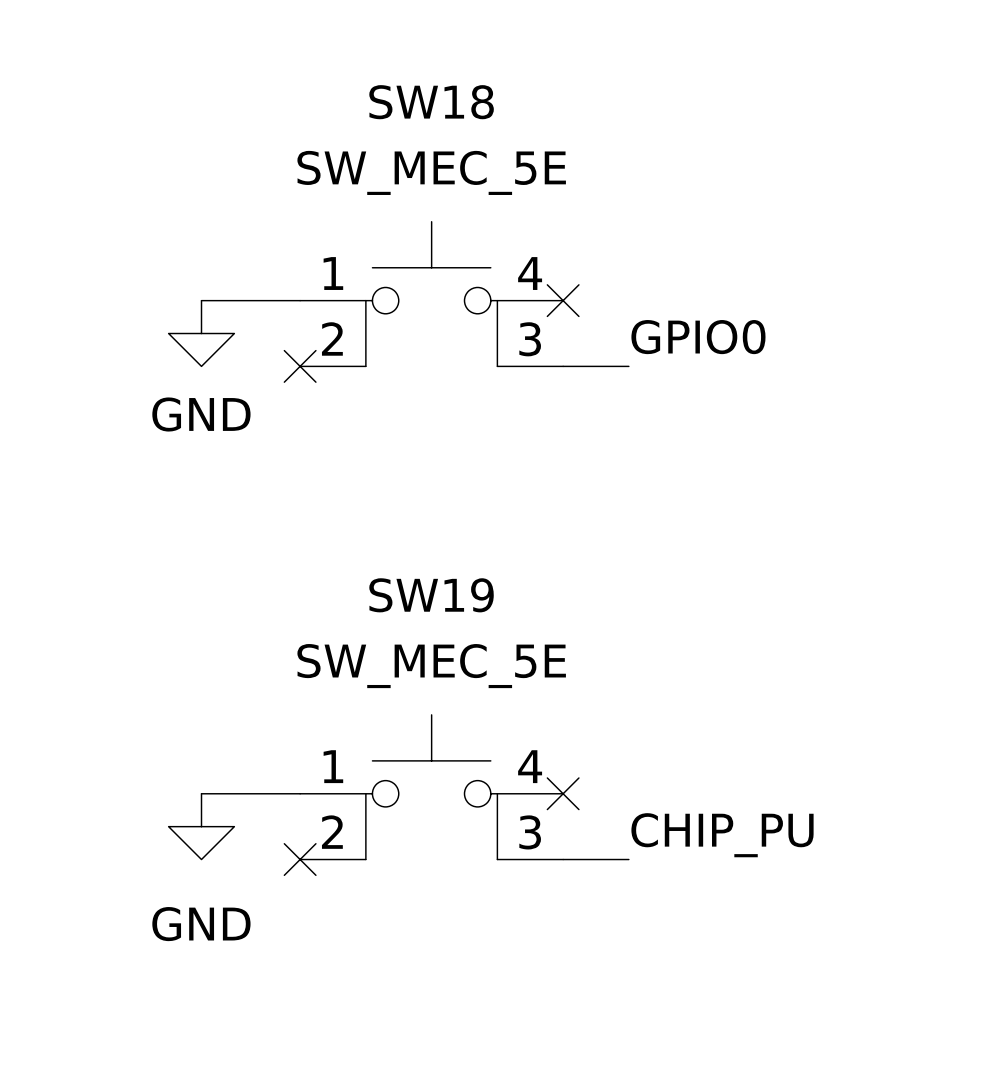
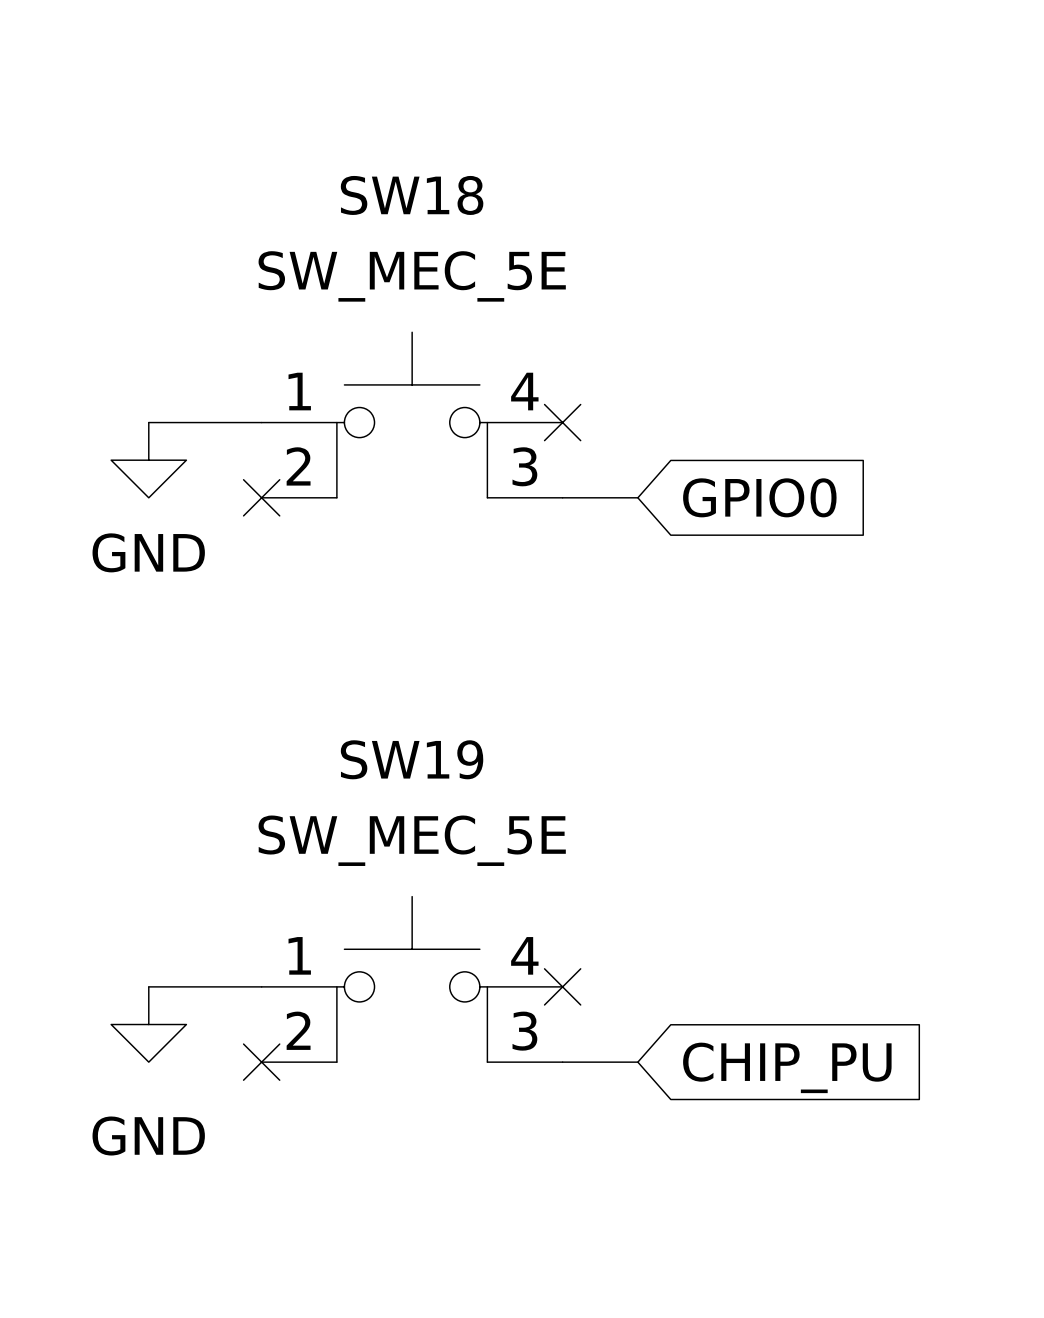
label: GPIO0 (698, 337) -> none
global label: none -> GPIO0 (759, 497)
label: CHIP_PU (722, 835) -> none
global label: none -> CHIP_PU (787, 1067)

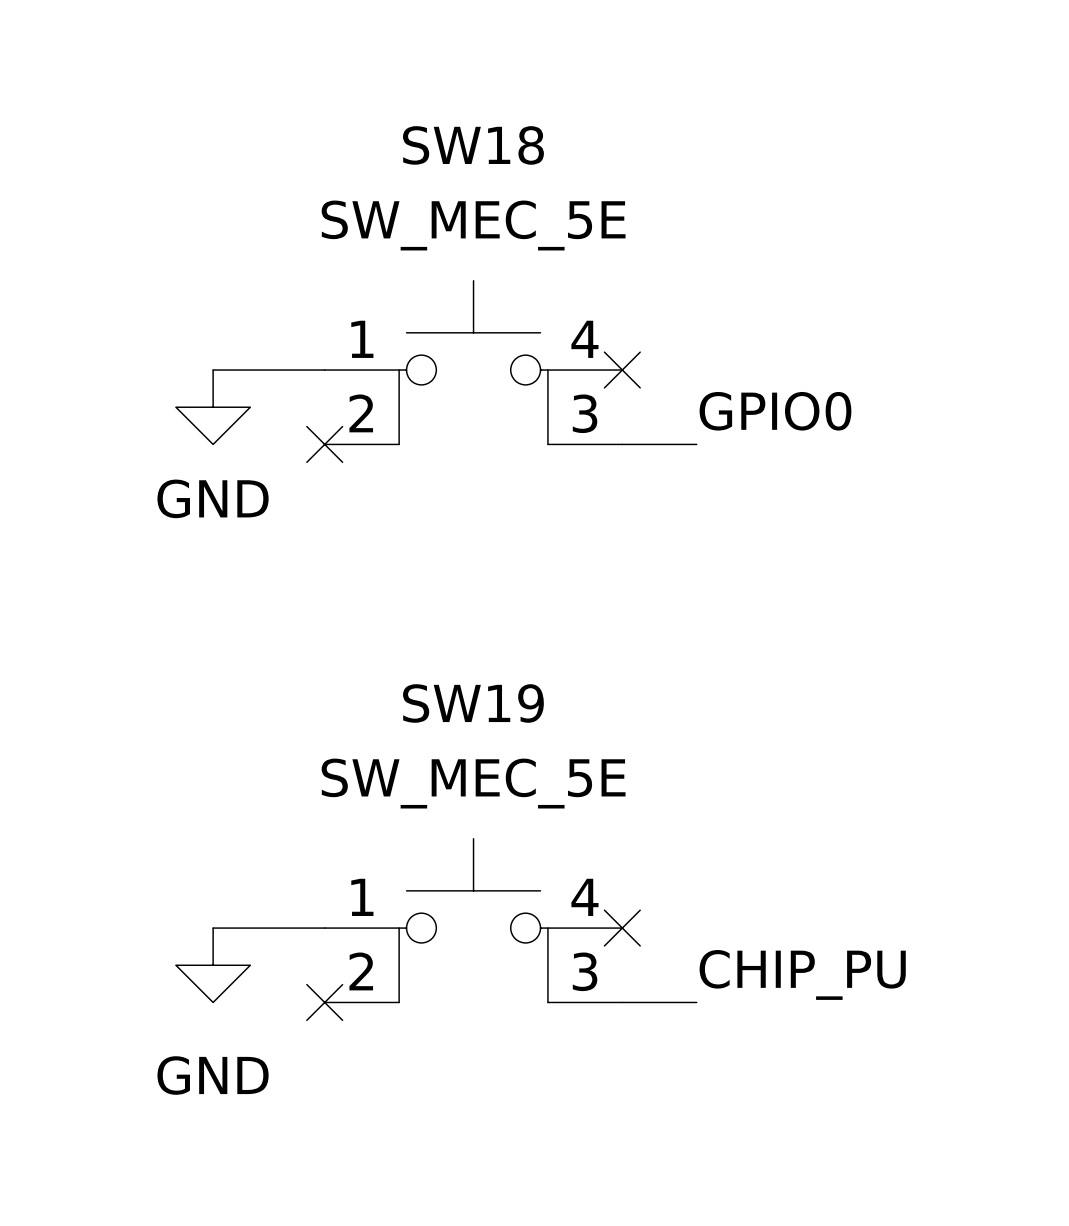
label: none -> GPIO0 (775, 411)
global label: GPIO0 (759, 497) -> none
label: none -> CHIP_PU (802, 974)
global label: CHIP_PU (787, 1067) -> none

